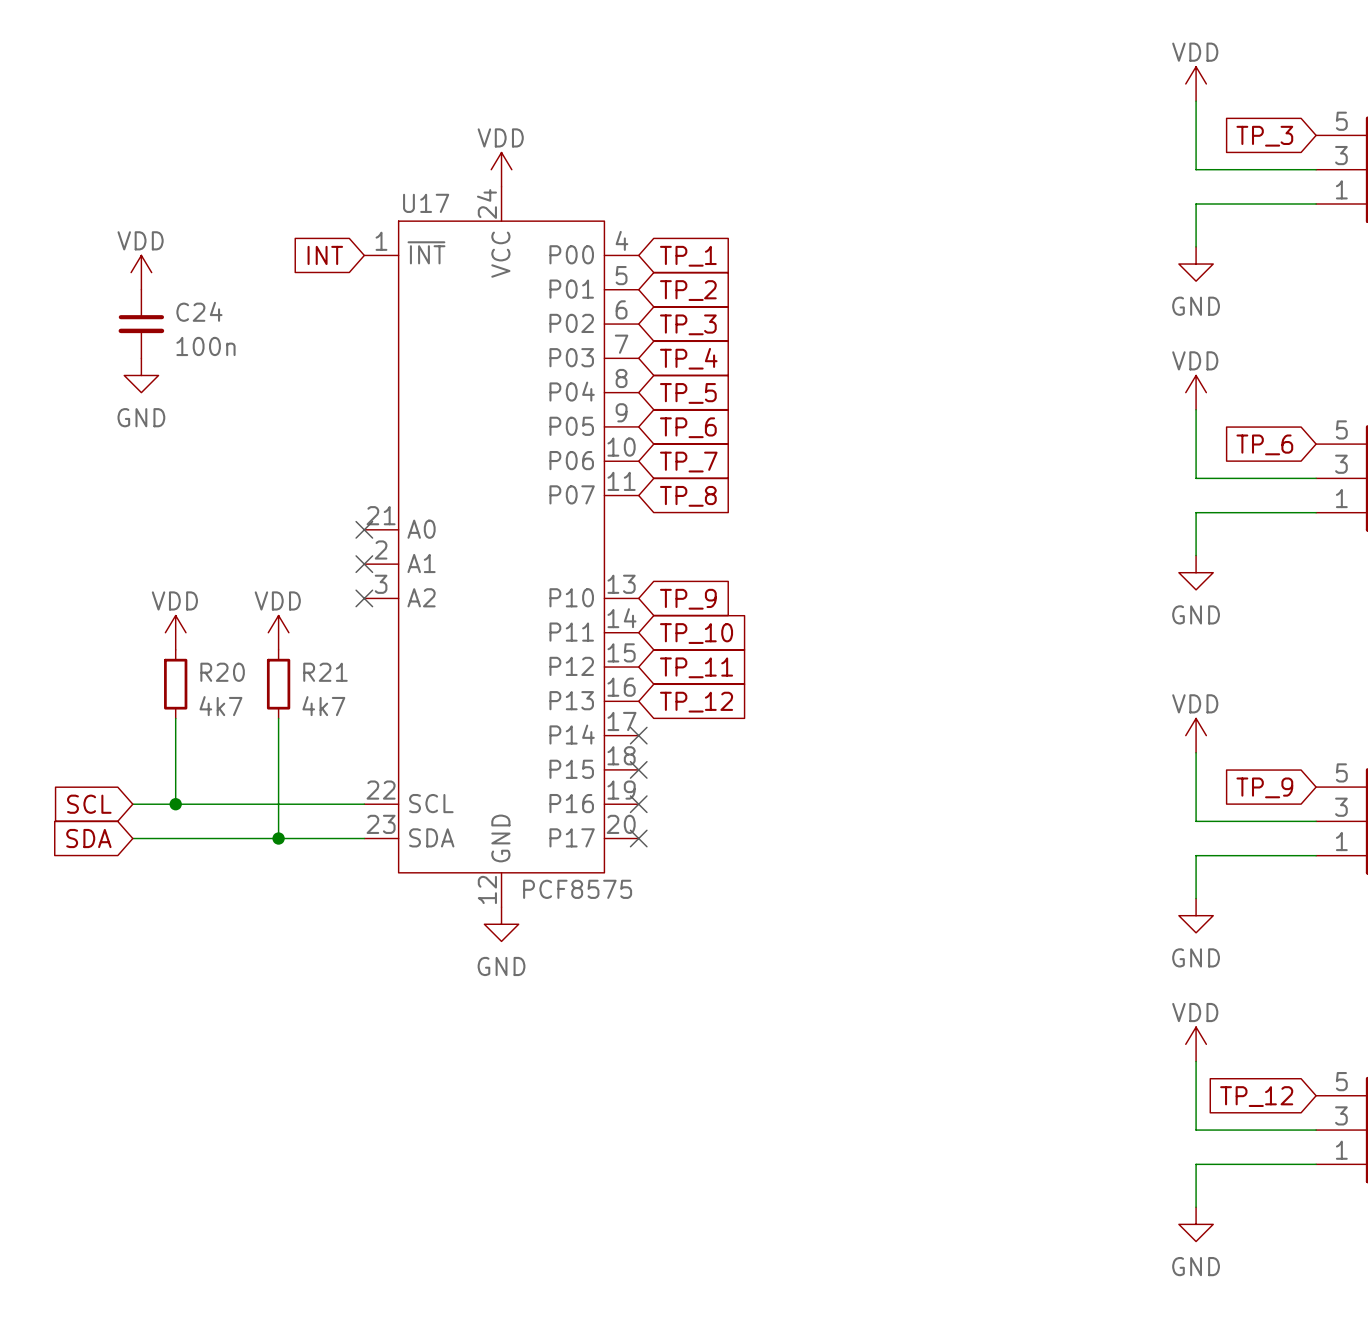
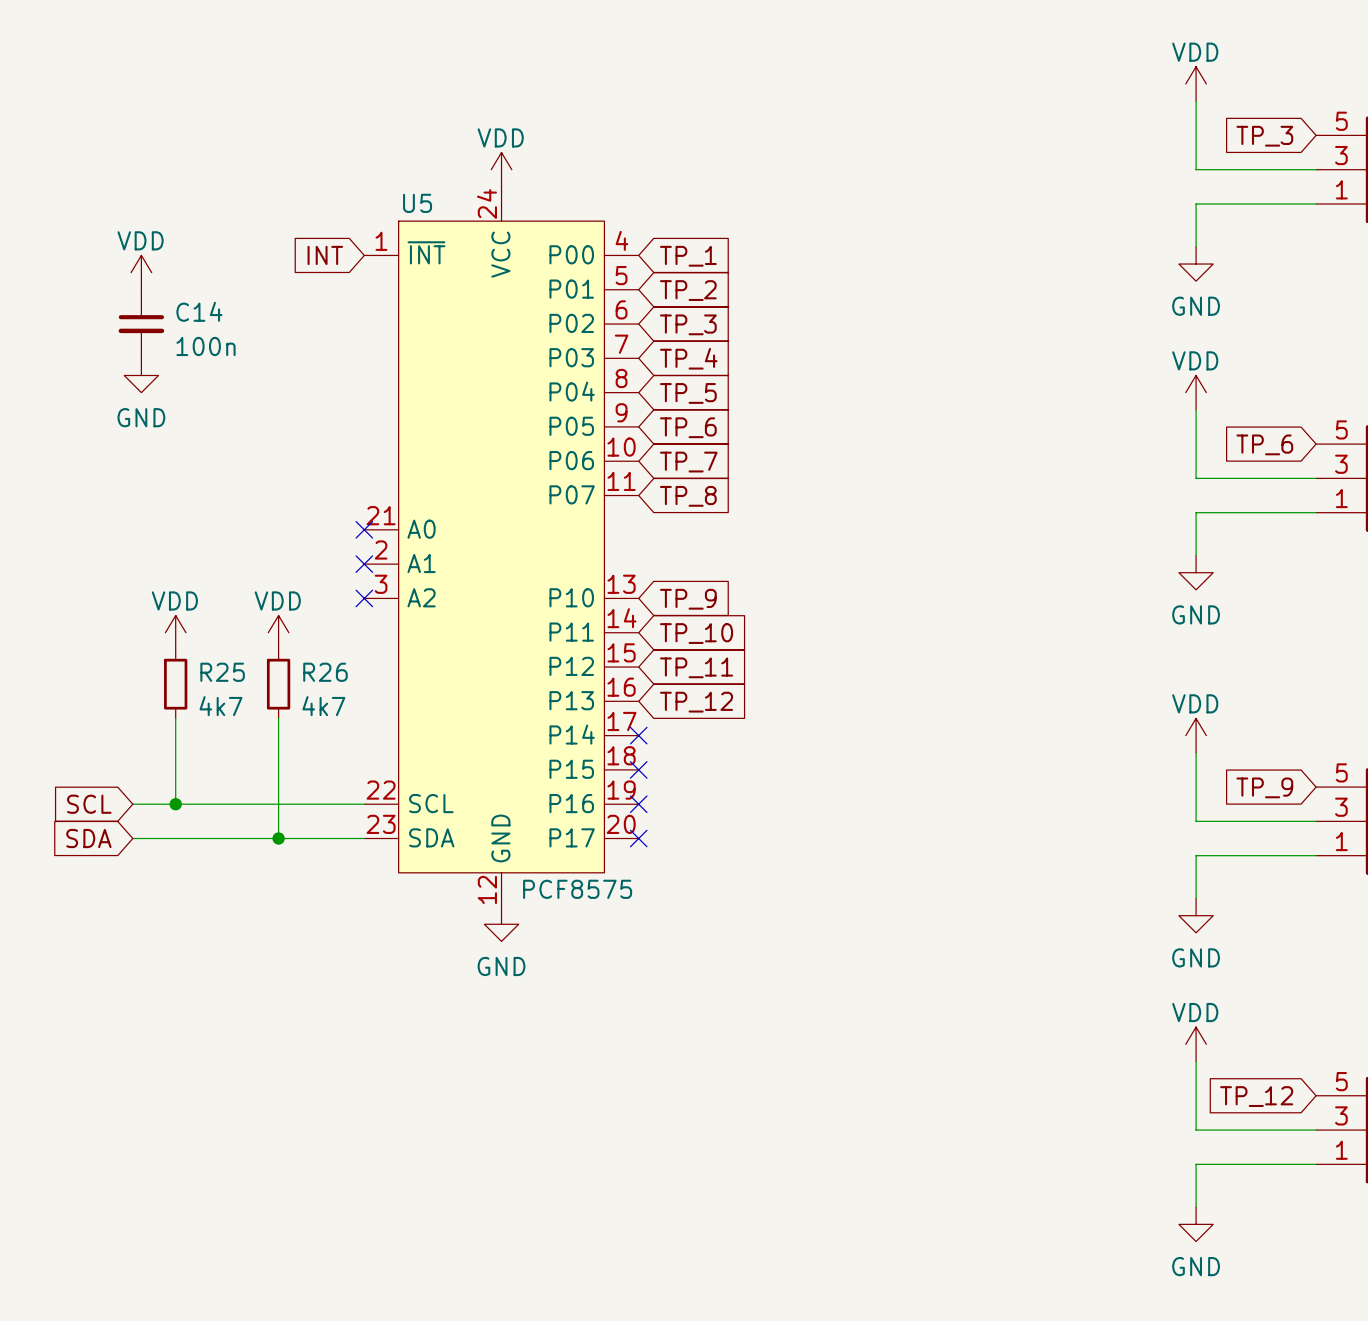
U17 name: U17 (426, 203) -> U5 (417, 203)
C24 name: C24 (199, 311) -> C14 (199, 311)
R20 name: R20 (222, 672) -> R25 (222, 672)
R21 name: R21 (325, 672) -> R26 (325, 672)

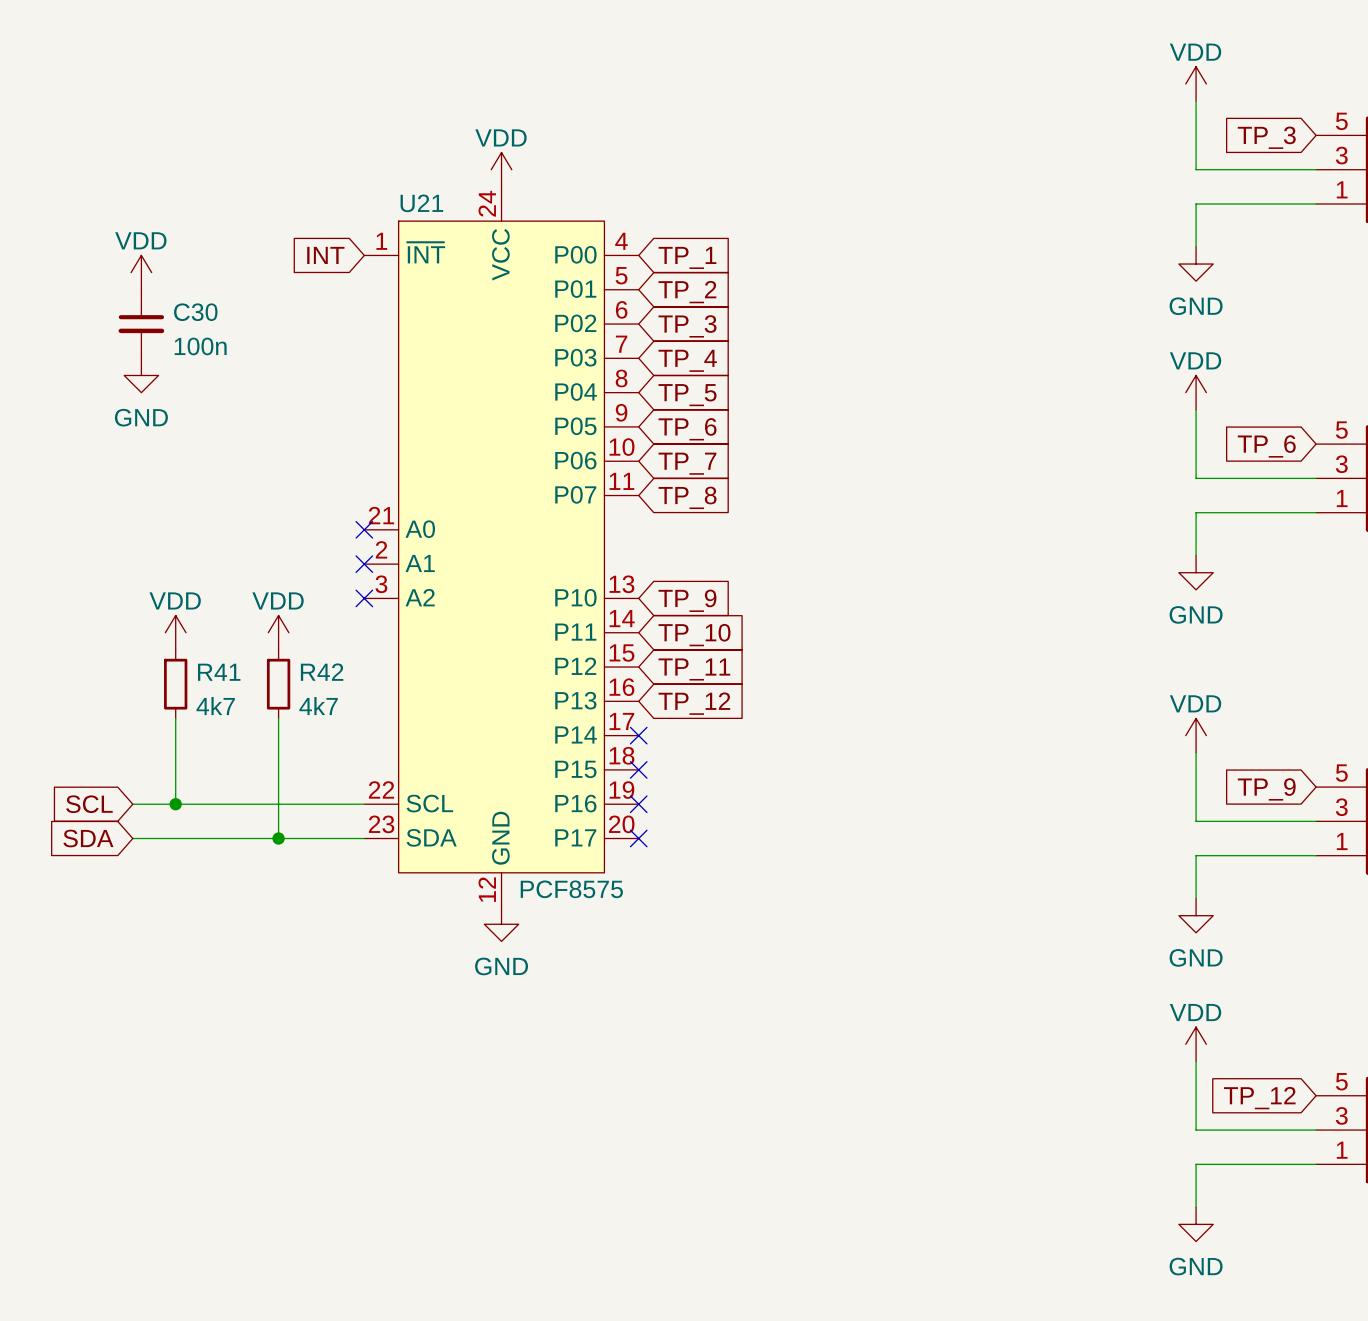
U5 name: U5 (417, 203) -> U21 (421, 203)
C14 name: C14 (199, 311) -> C30 (195, 312)
R25 name: R25 (222, 672) -> R41 (219, 672)
R26 name: R26 (325, 672) -> R42 (322, 672)

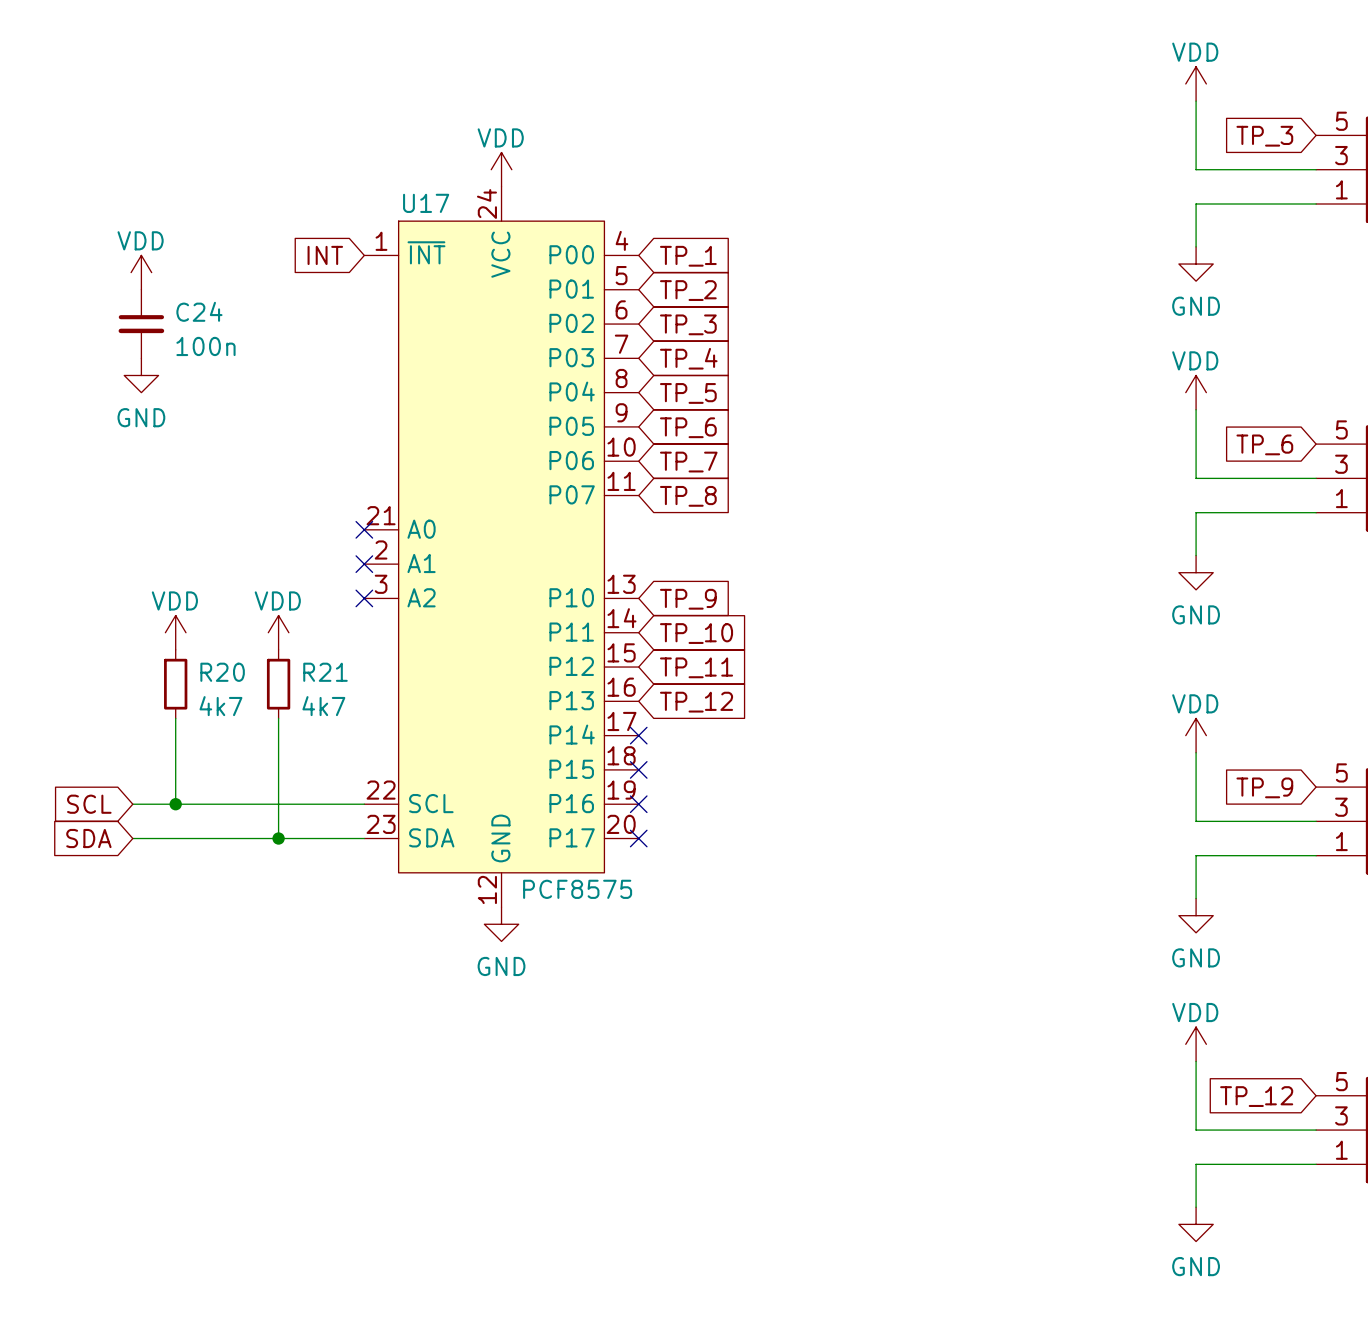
U21 name: U21 (421, 203) -> U17 (426, 203)
C30 name: C30 (195, 312) -> C24 (199, 311)
R41 name: R41 (219, 672) -> R20 (222, 672)
R42 name: R42 (322, 672) -> R21 (325, 672)

